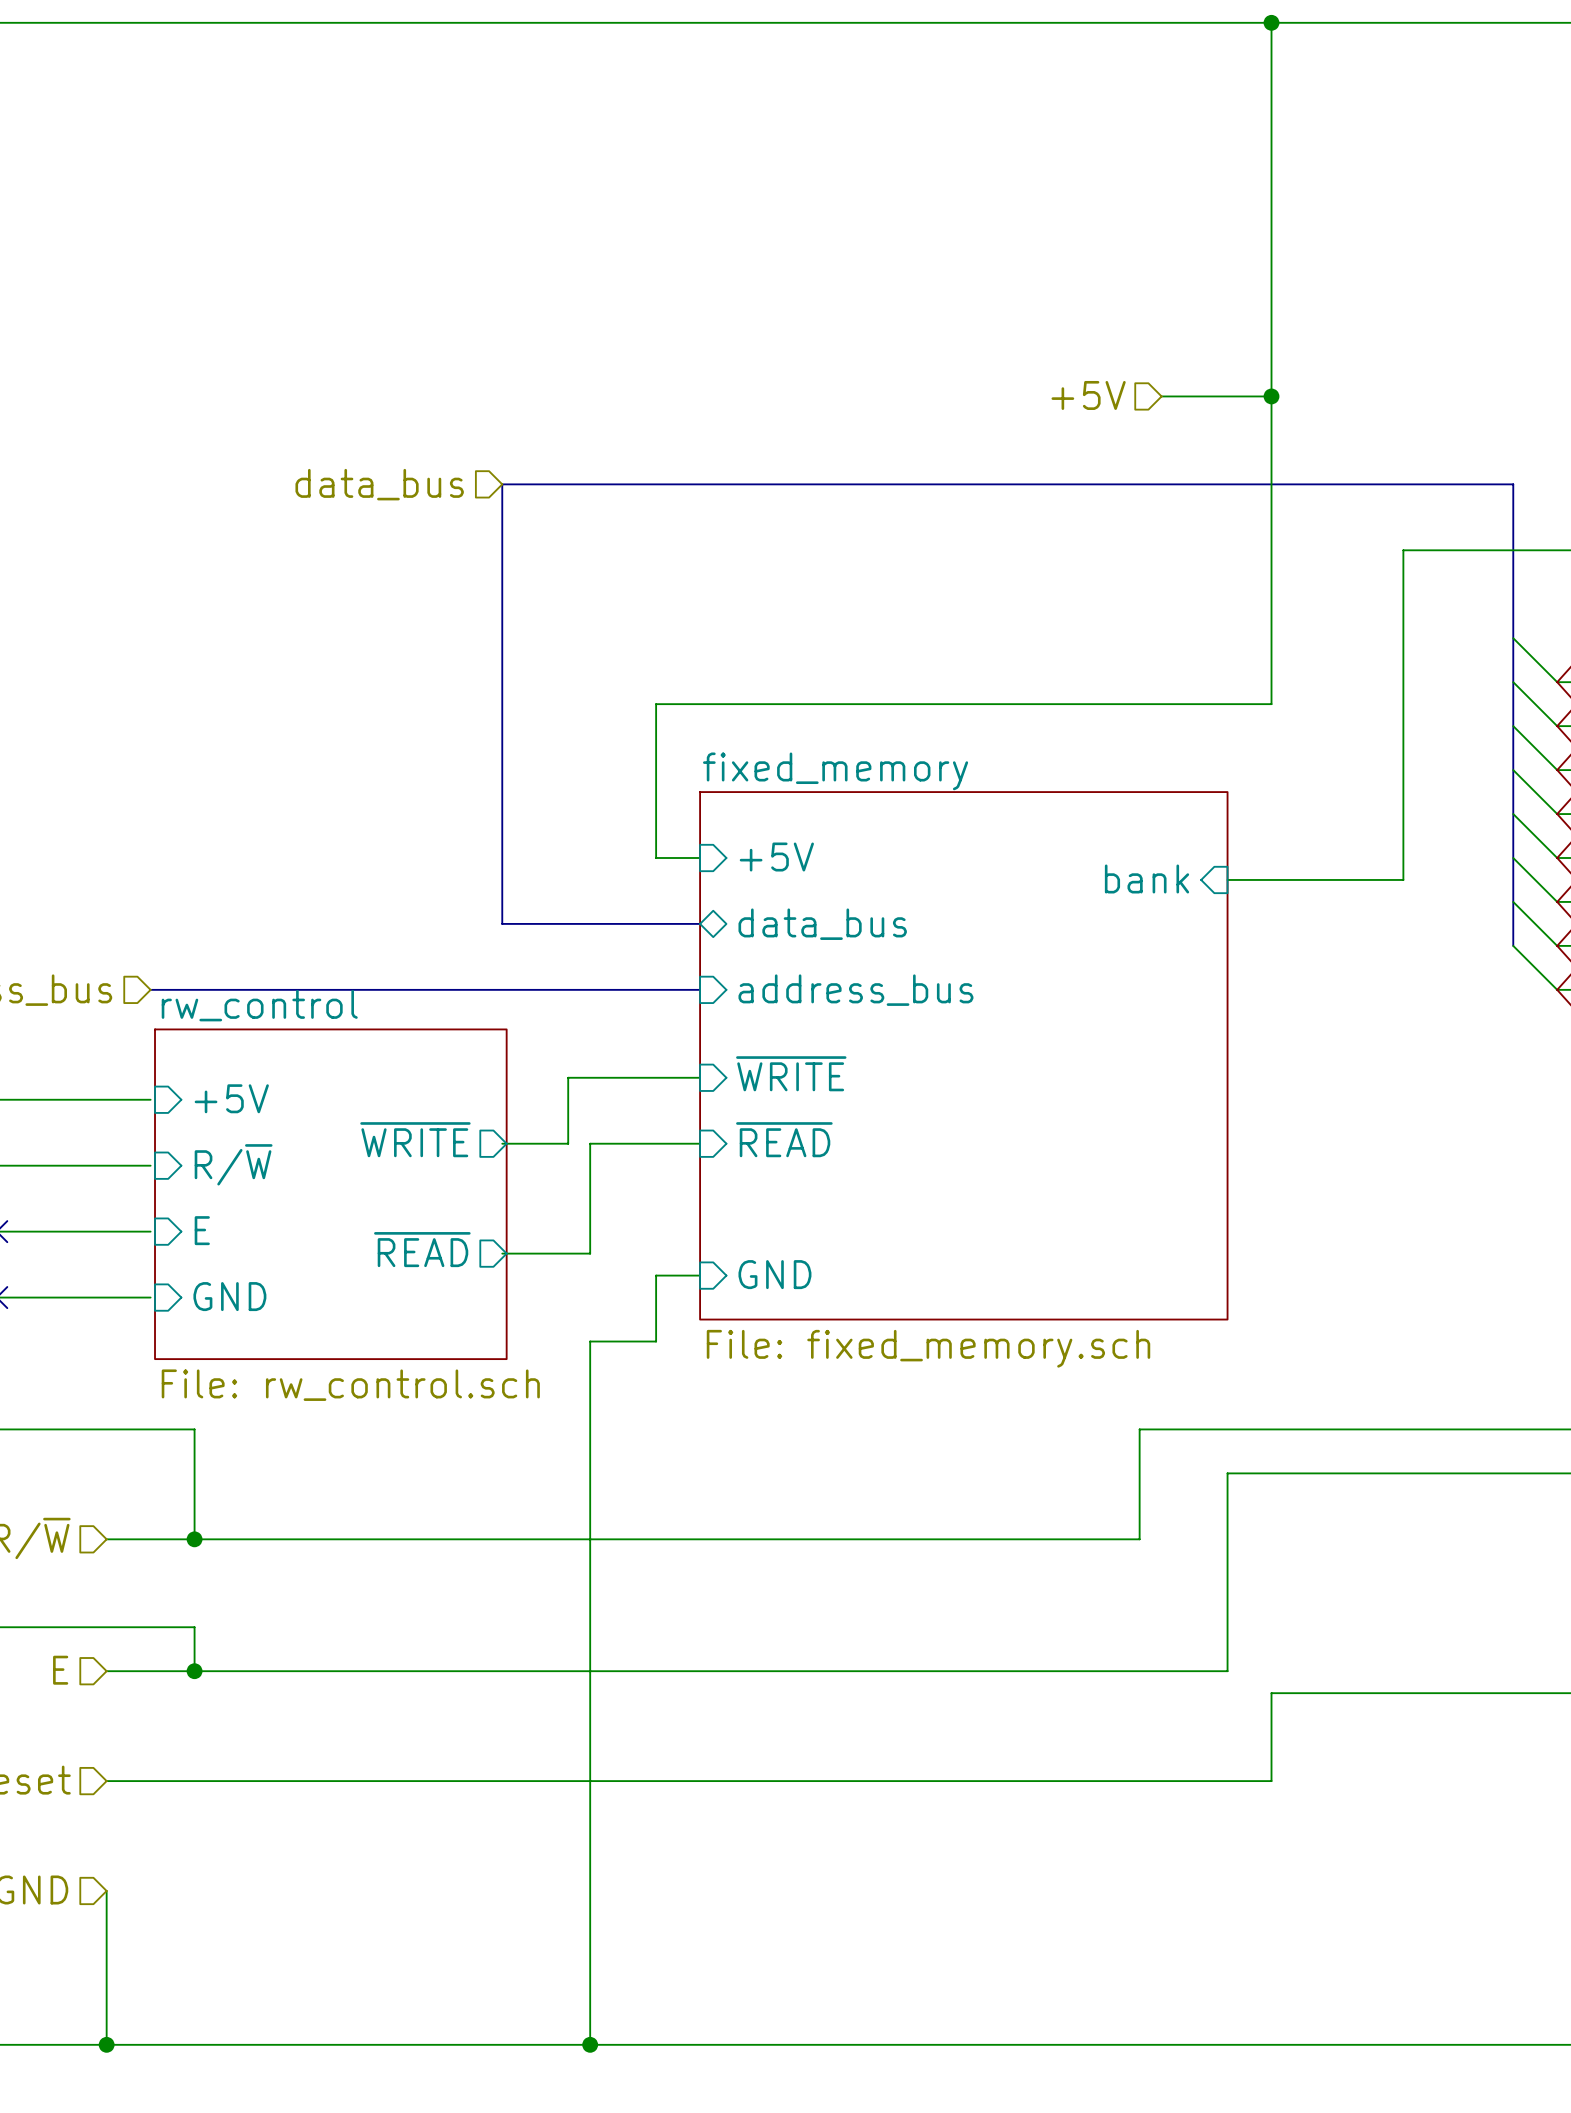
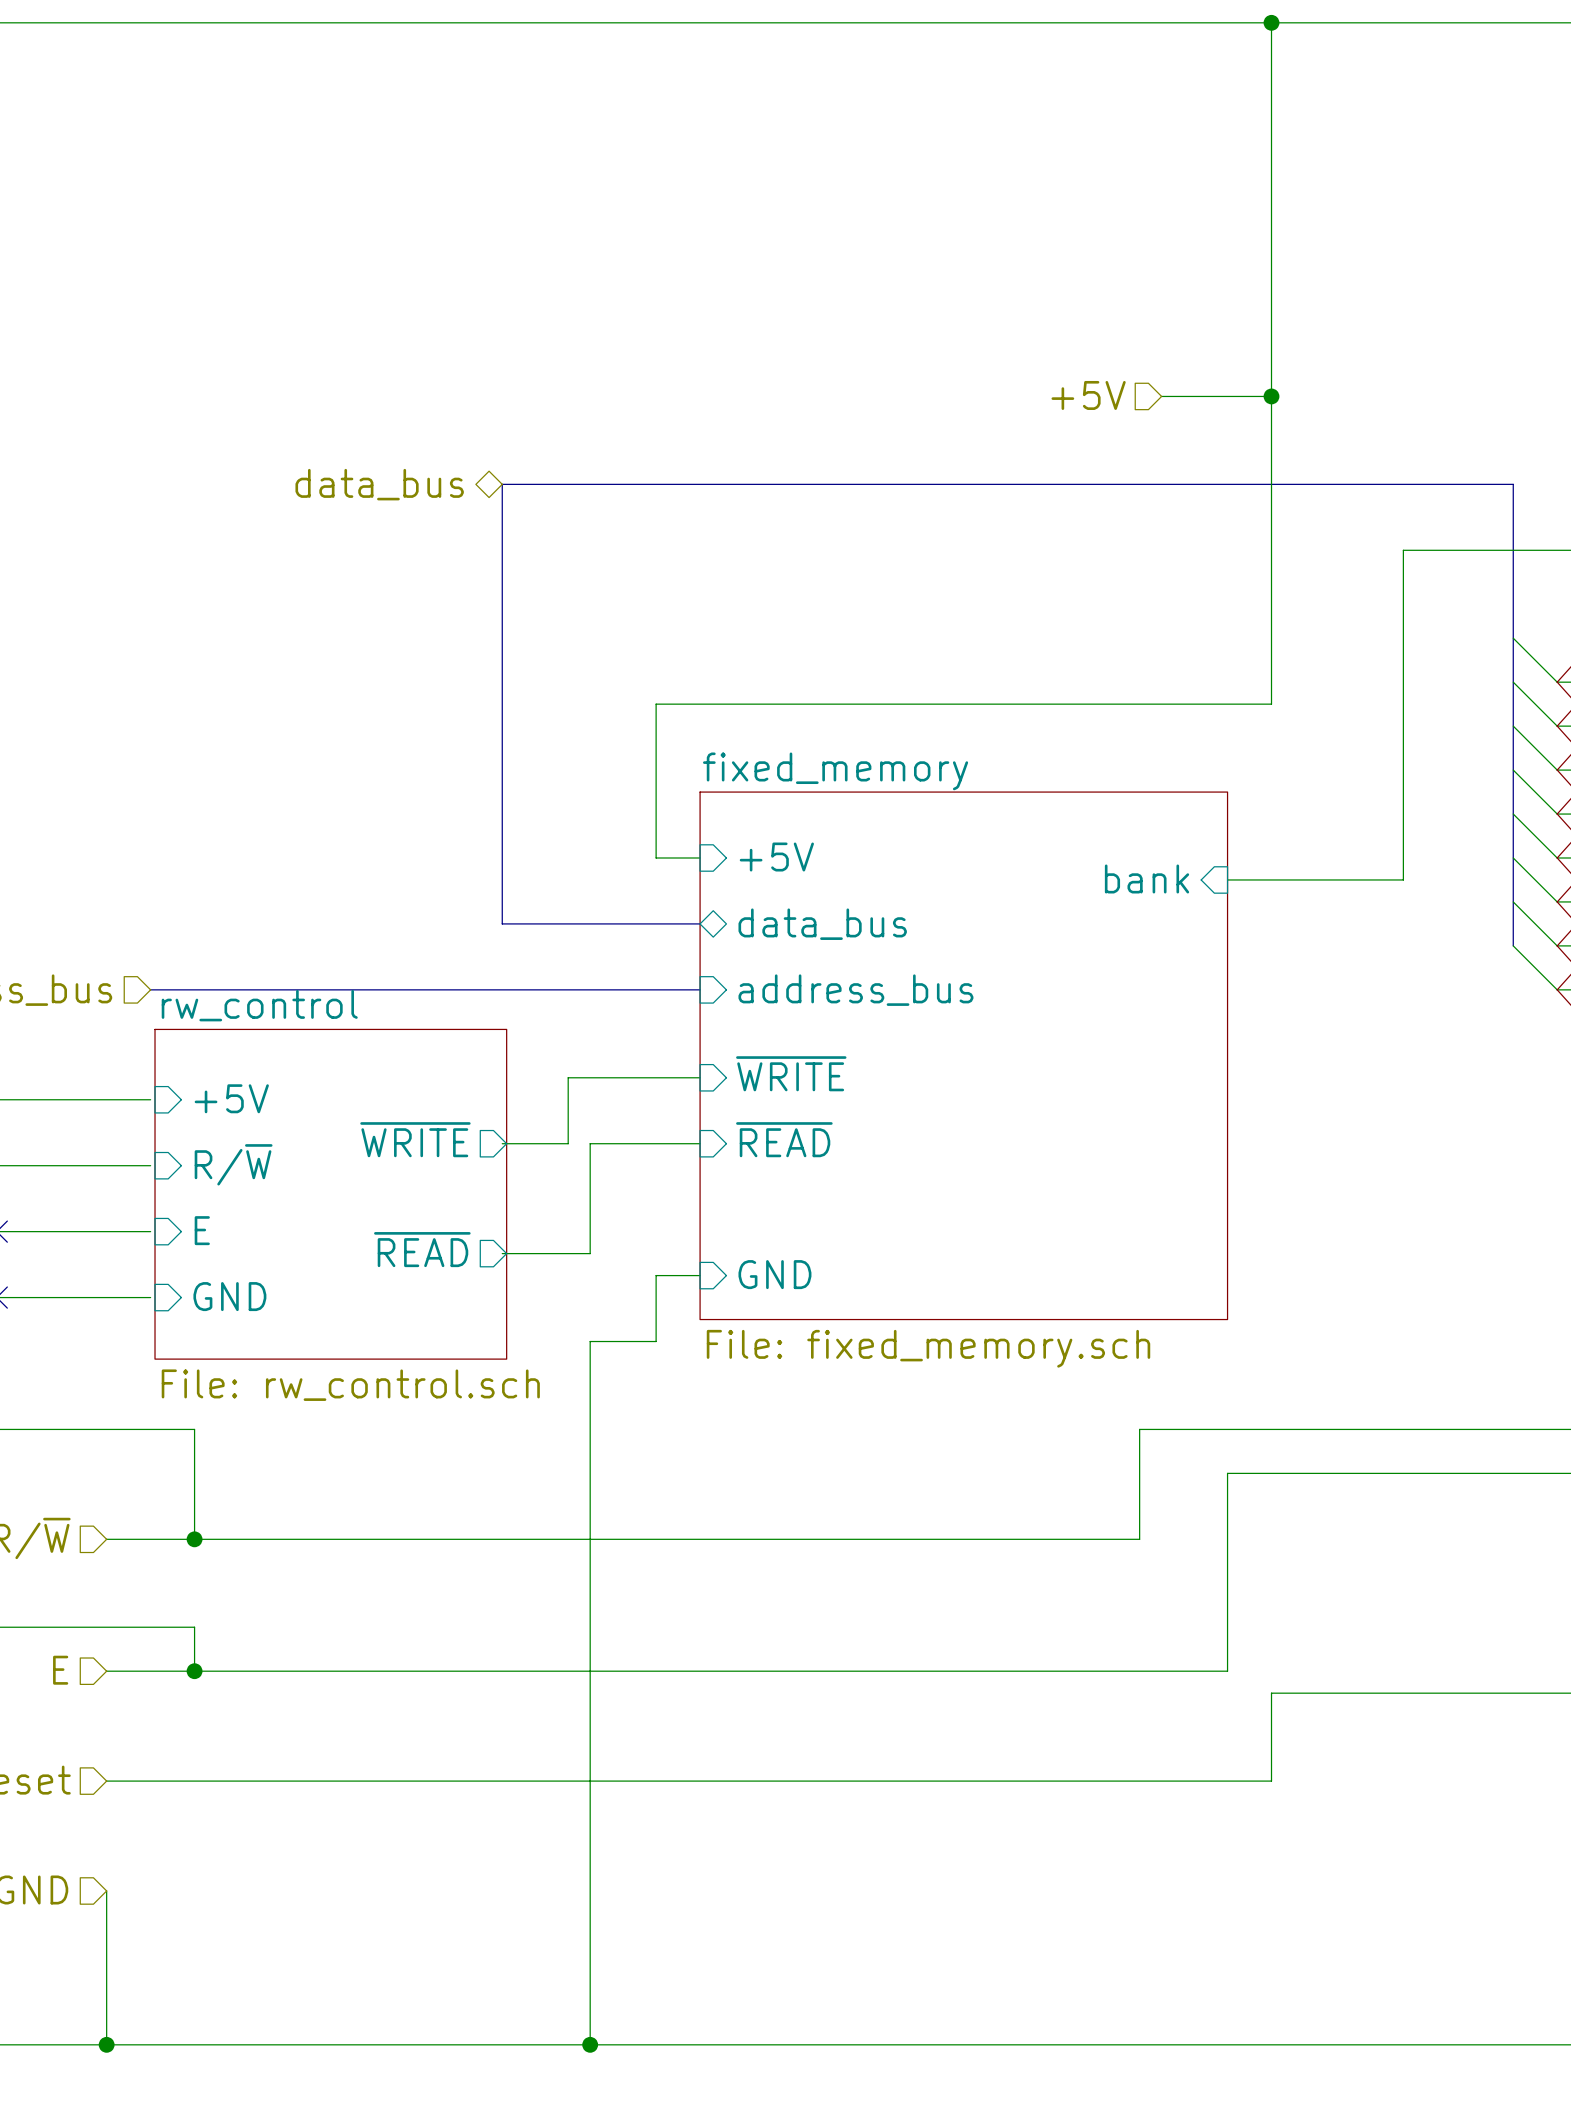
hierarchical label shape: input (379, 484) -> bidirectional (379, 484)

